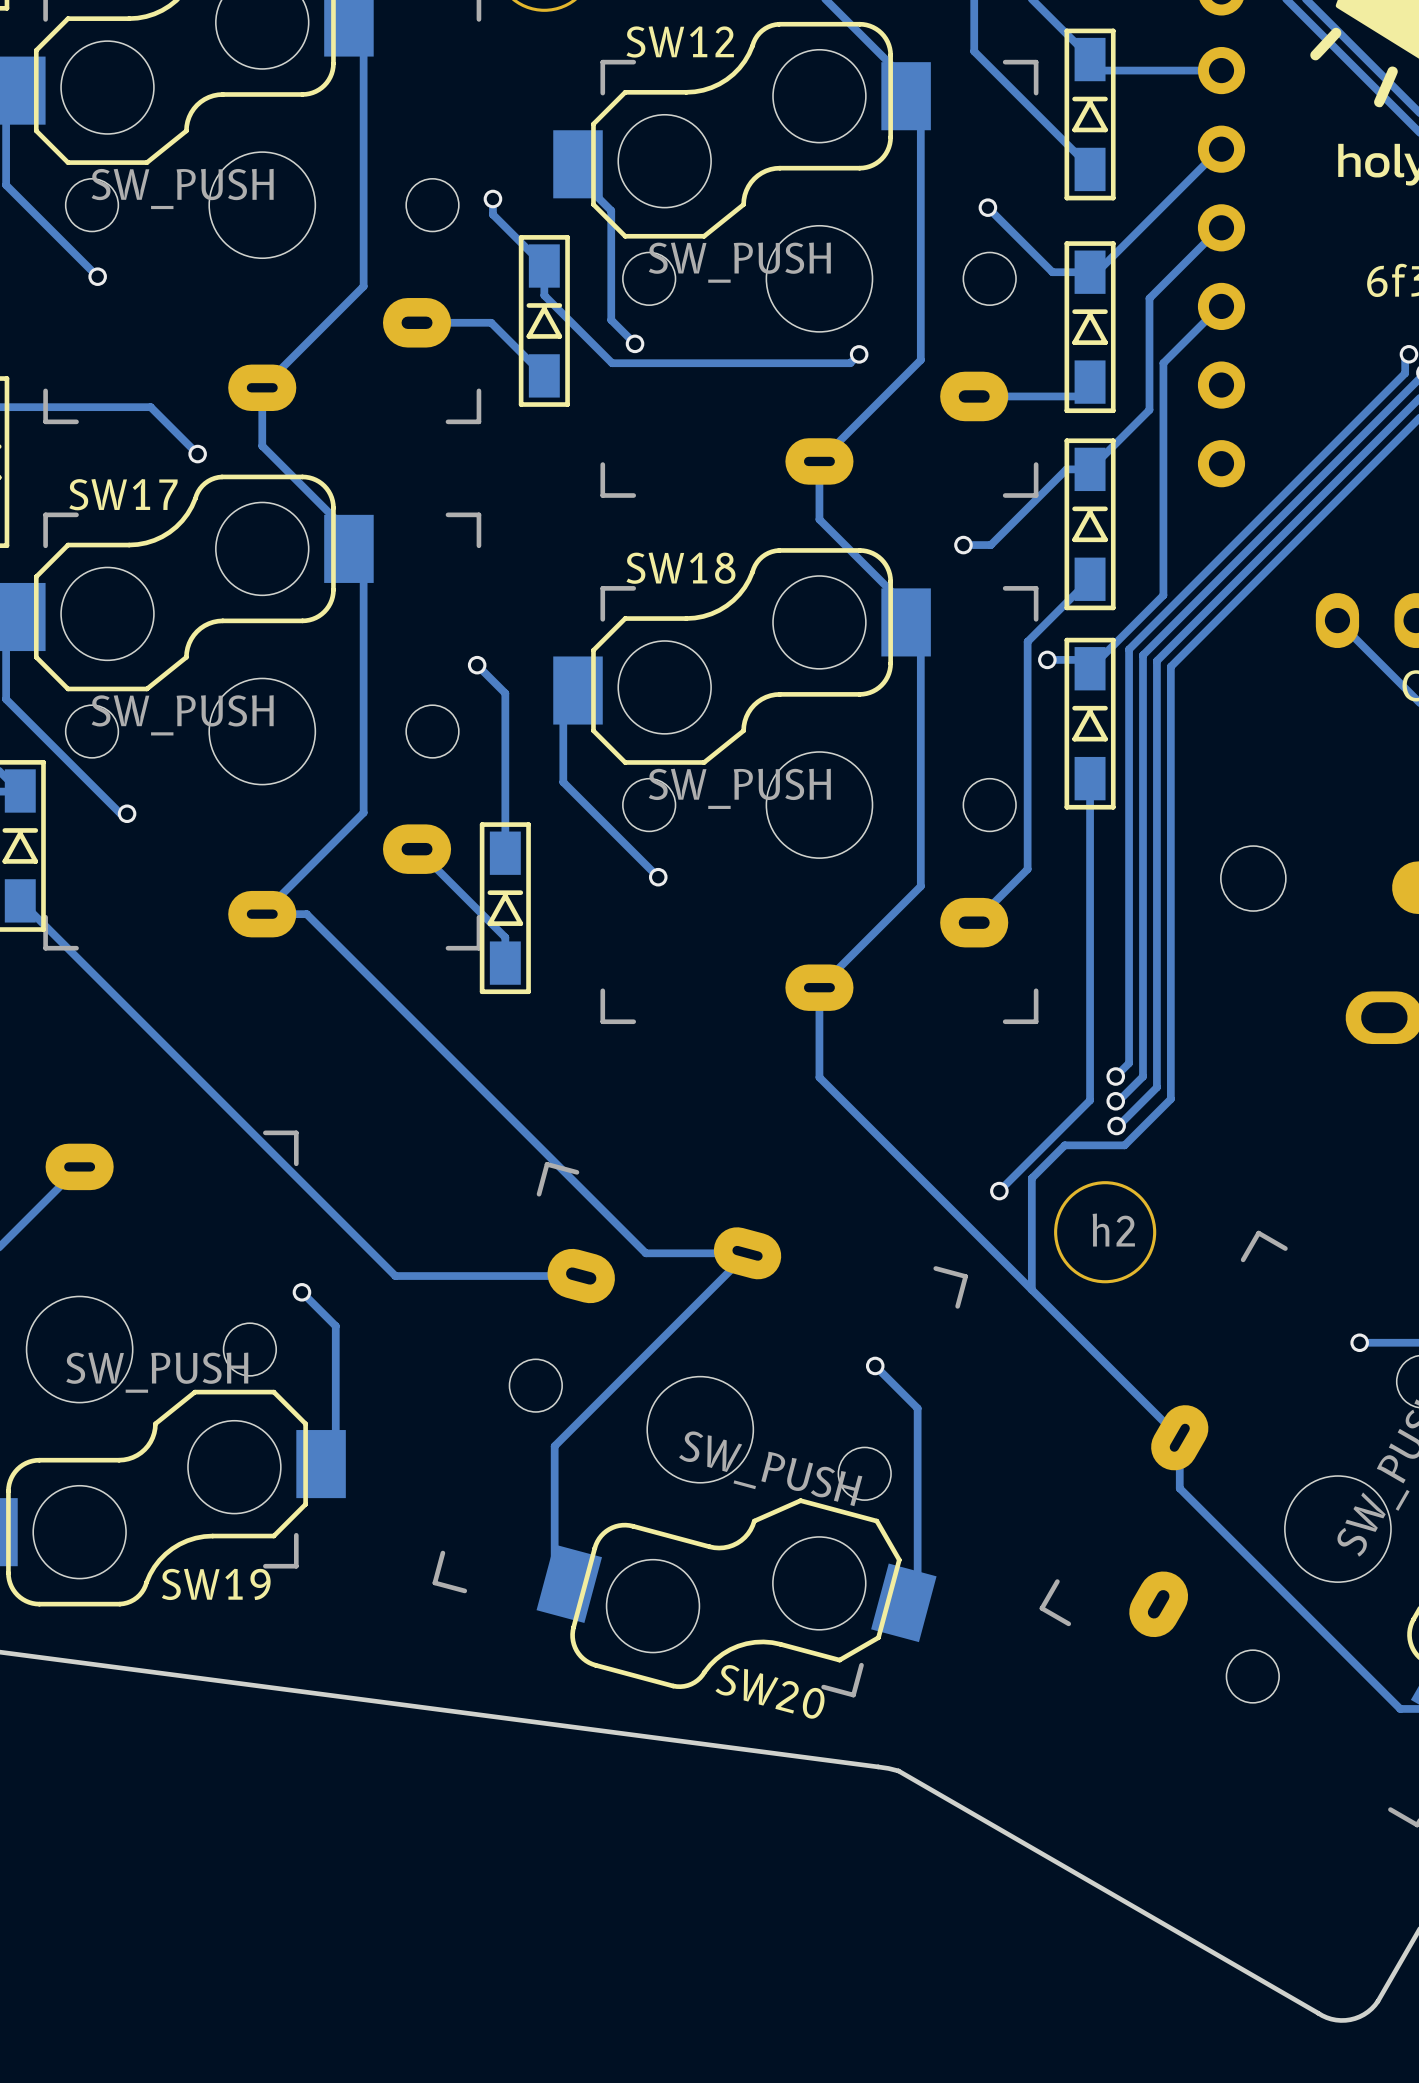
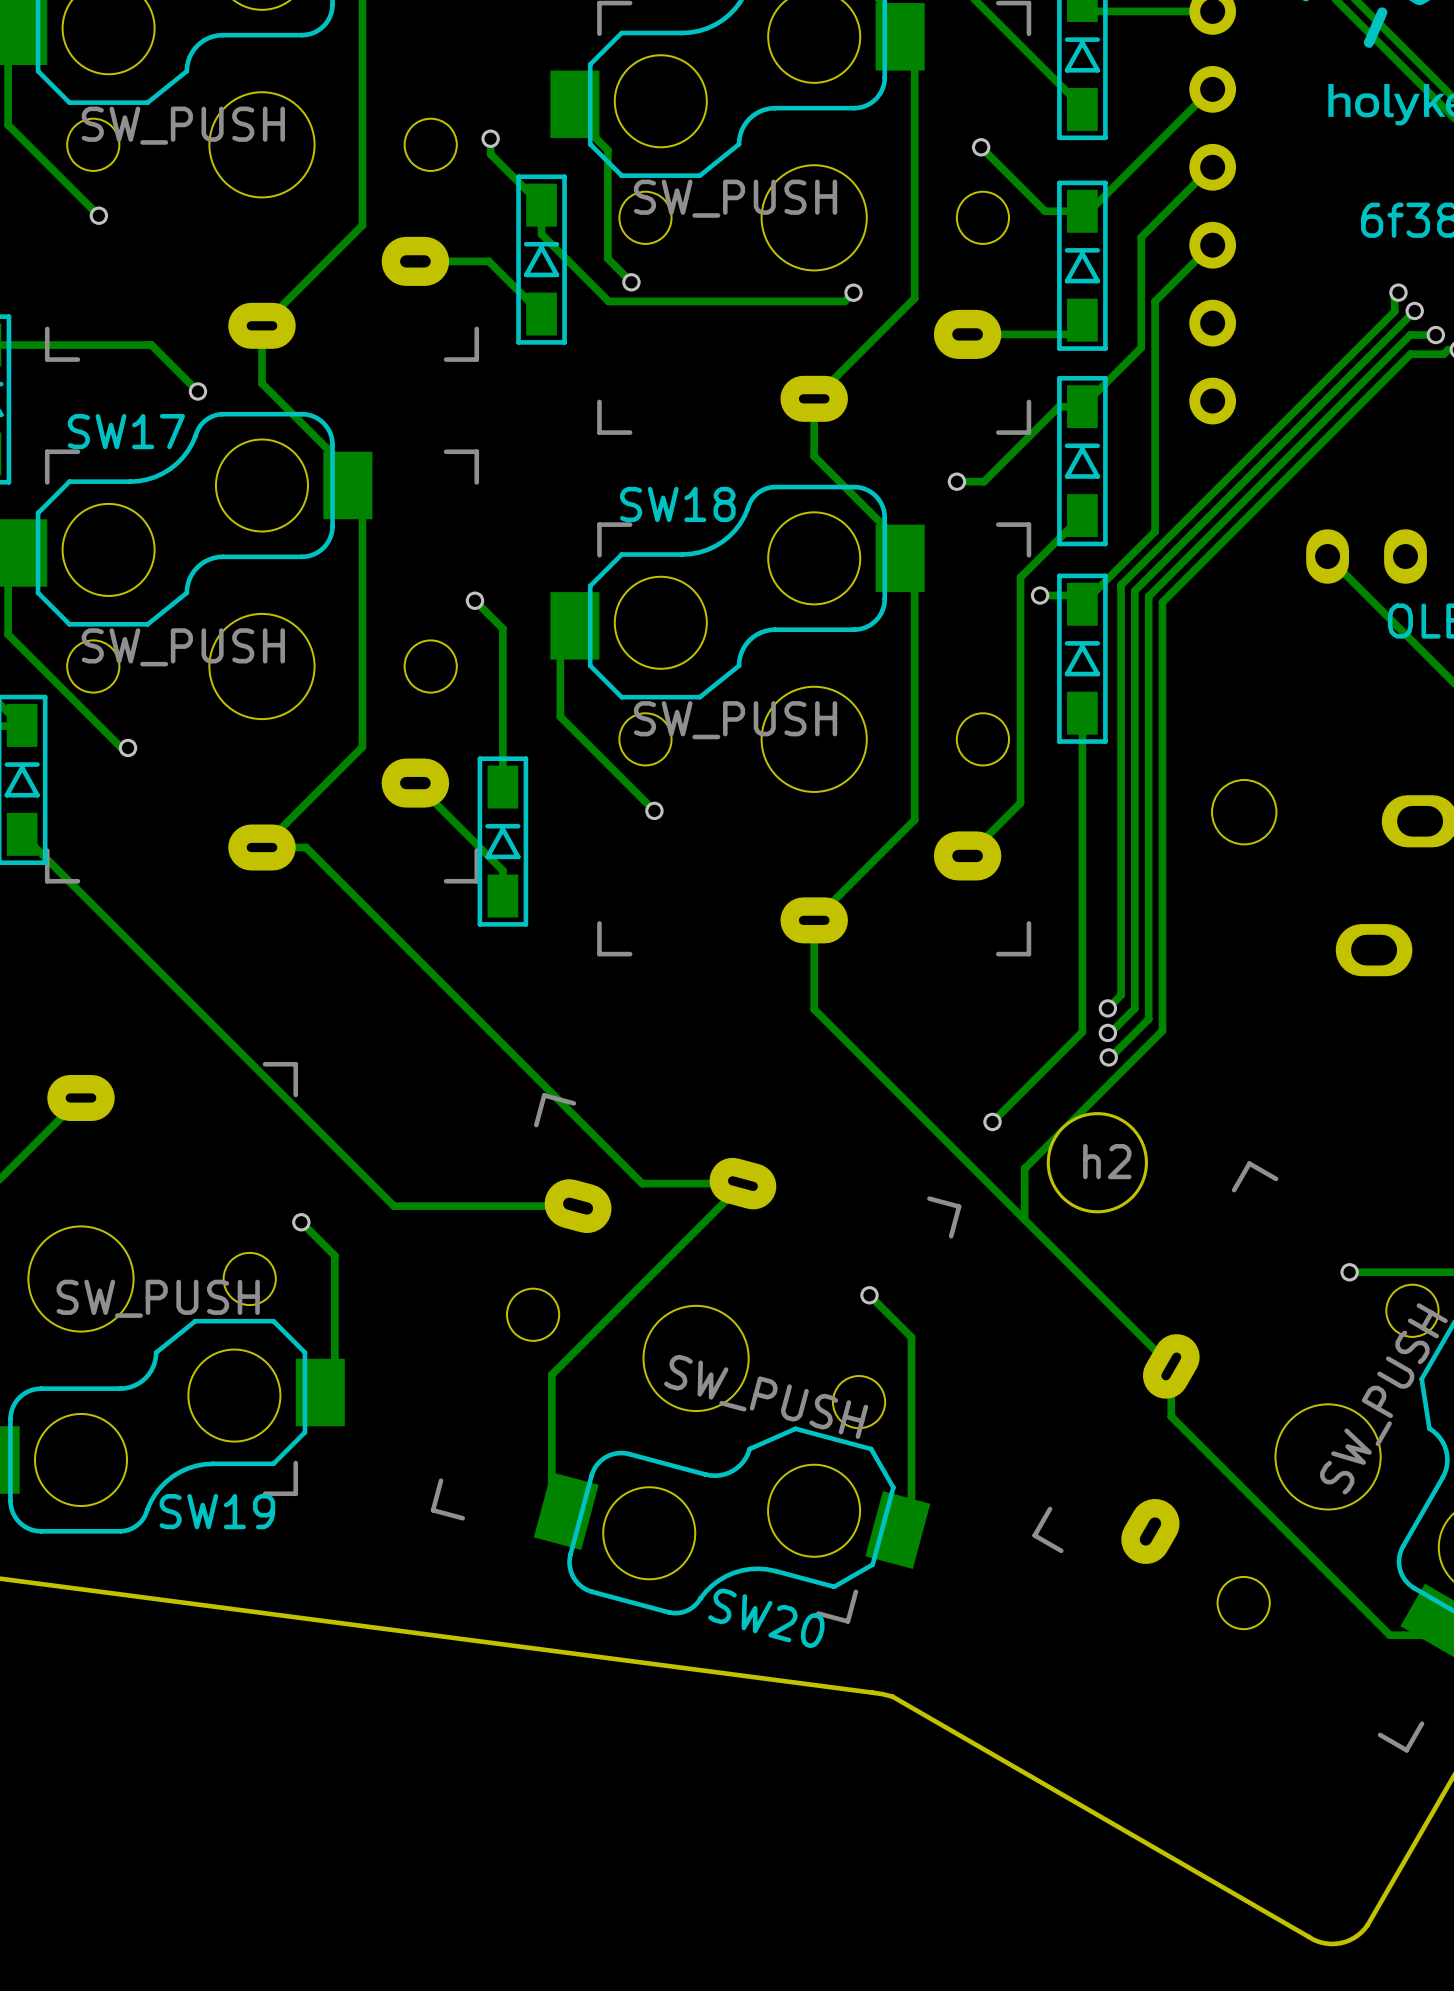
track: (1124, 1145) (1064, 1145) (1031, 1178) (1031, 1238) -> (1116, 1076) (1024, 1168)

